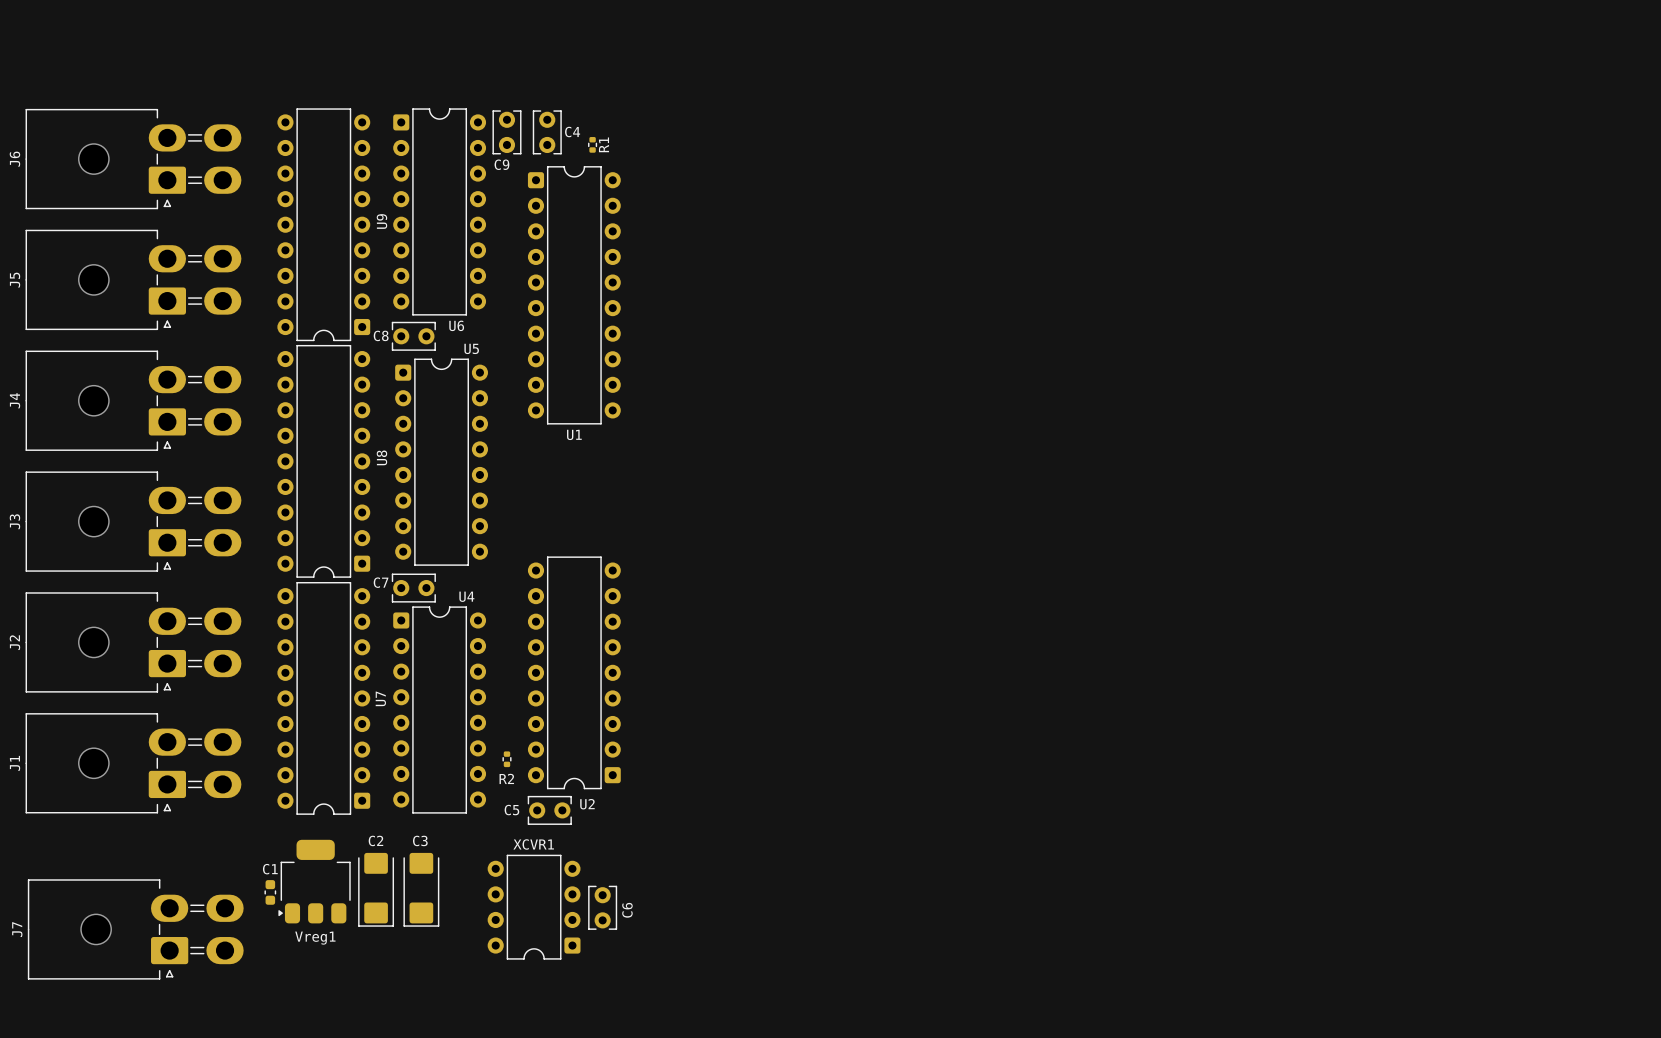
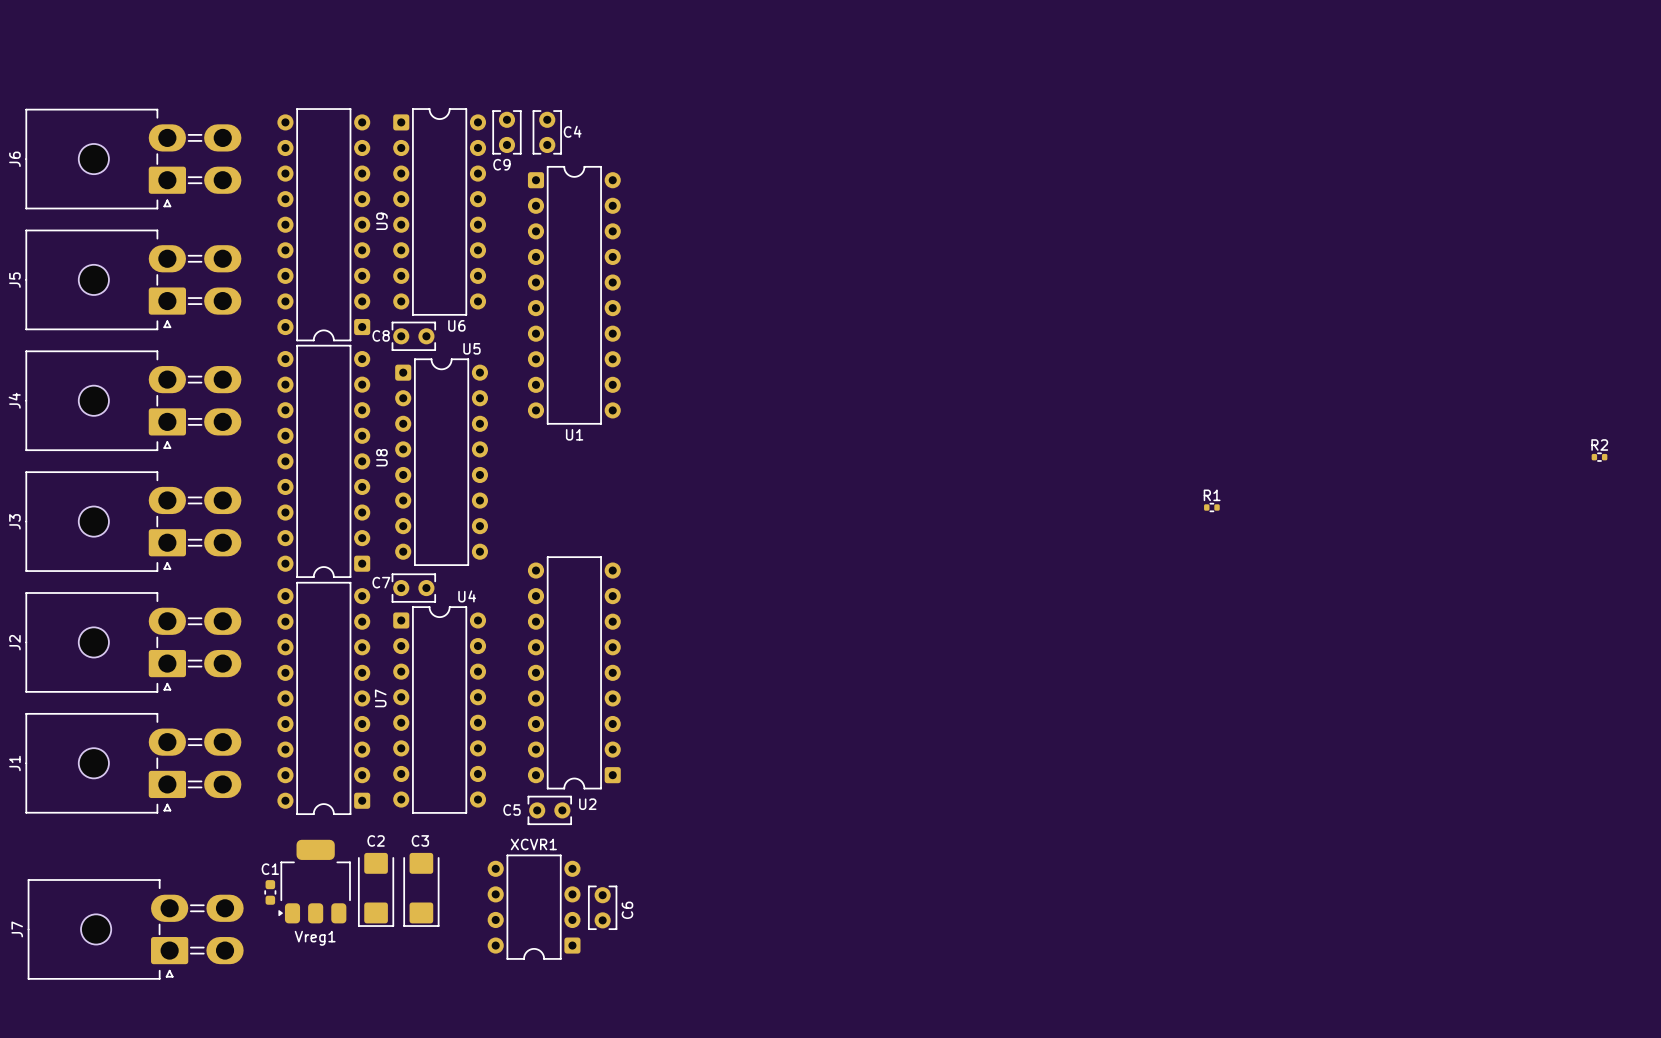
R1 rotation: 0° (592, 144) -> 90° clockwise (1211, 507)
R1 position: (592, 144) -> (1211, 507)
R2 rotation: 0° (506, 759) -> 90° clockwise (1599, 457)
R2 position: (506, 759) -> (1599, 457)
R2 name position: R2 (506, 778) -> R2 (1599, 444)

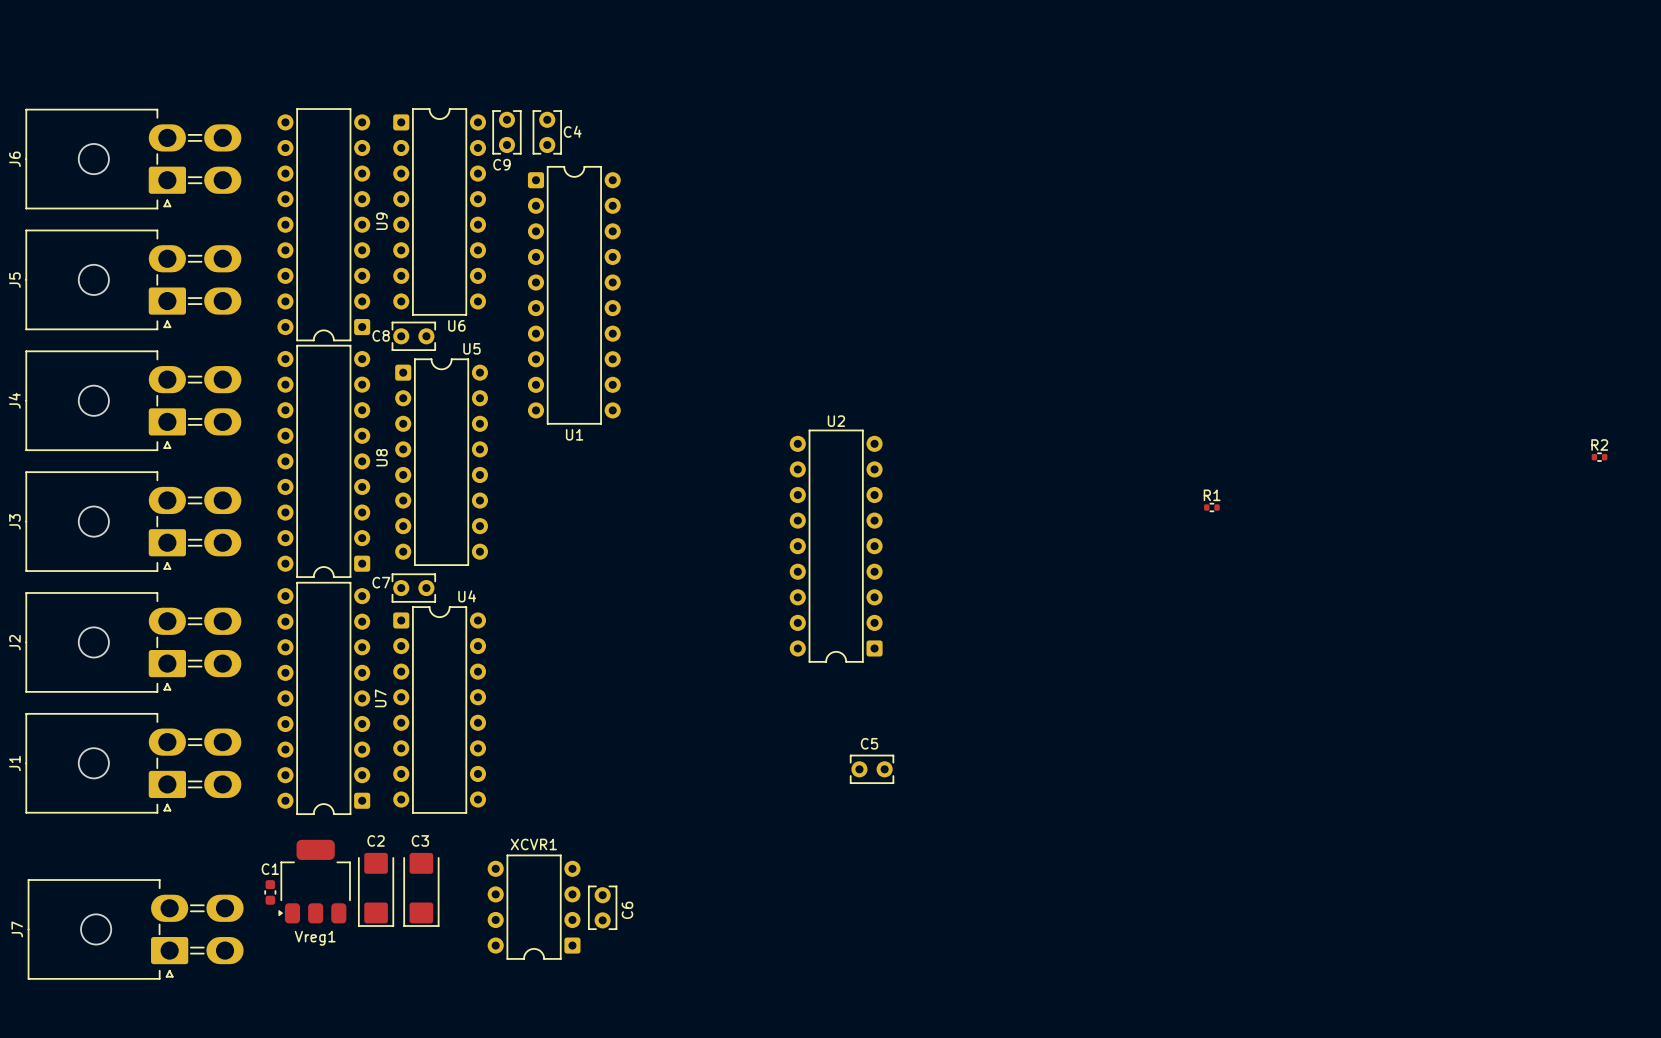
U2 position: (574, 672) -> (836, 546)
U2 name position: U2 (587, 804) -> U2 (836, 421)
C5 name position: C5 (512, 810) -> C5 (869, 743)
C5 position: (549, 810) -> (872, 769)

